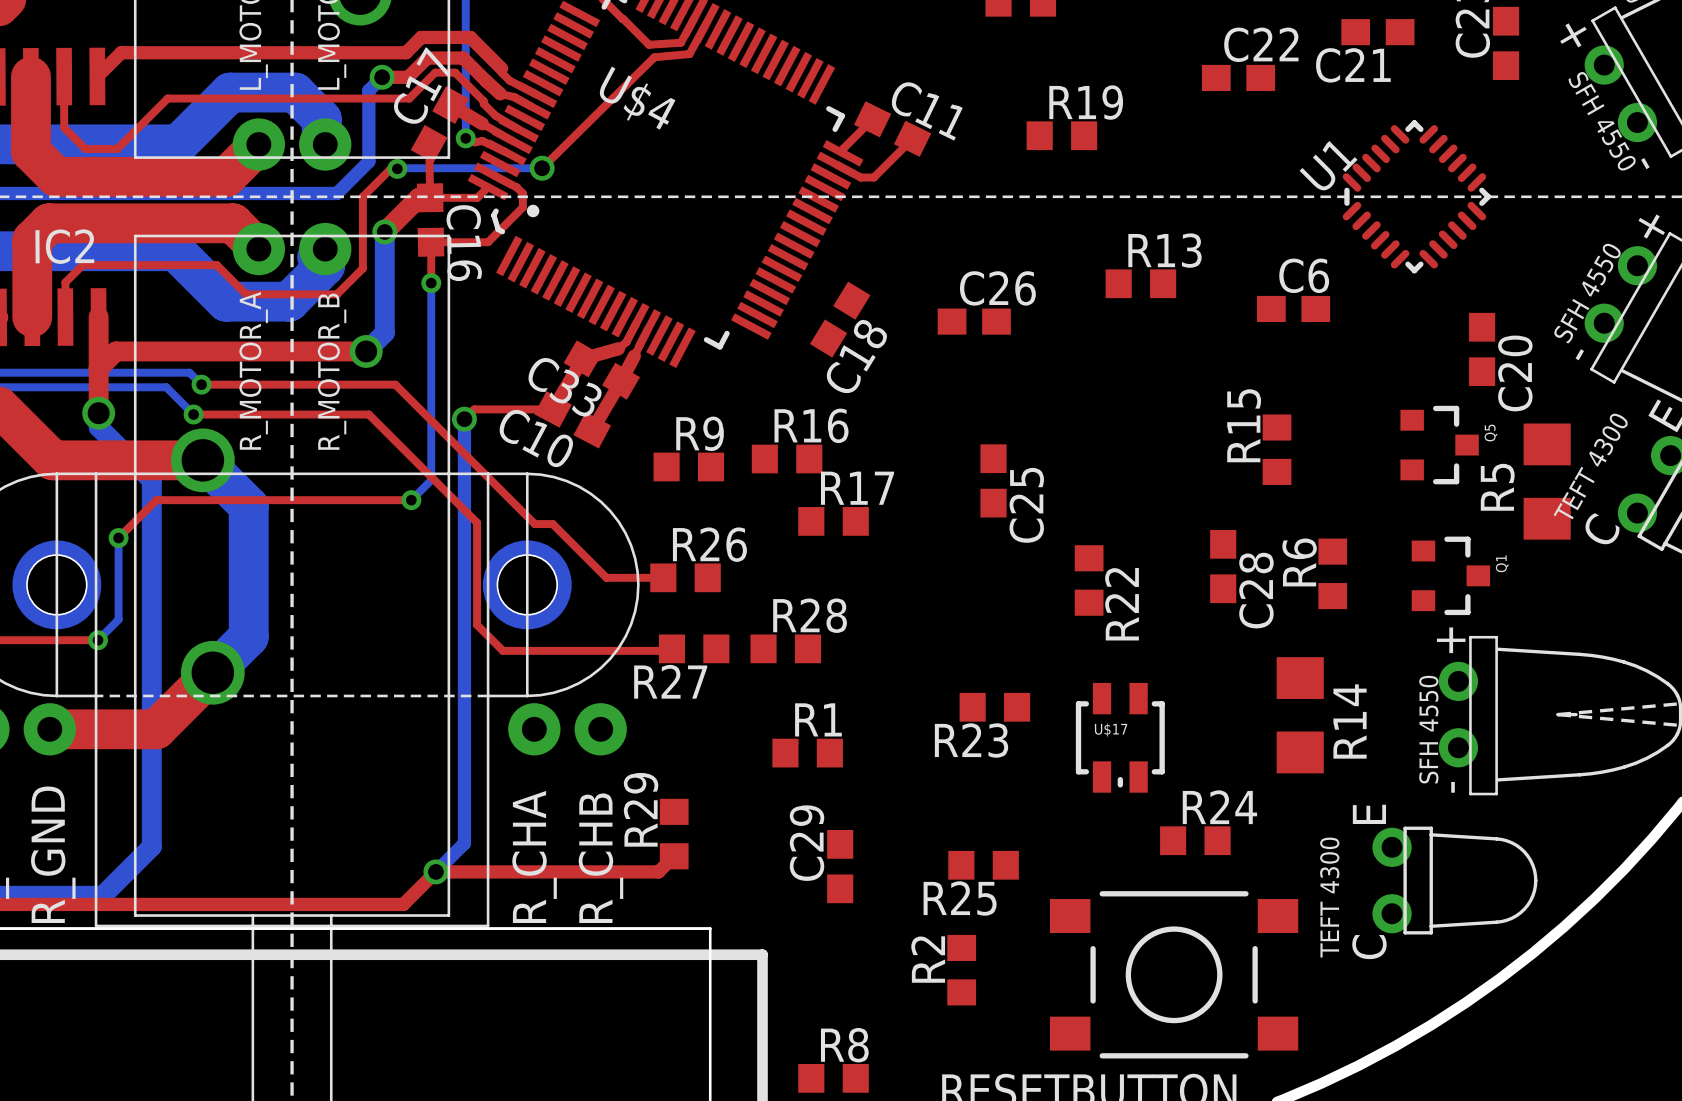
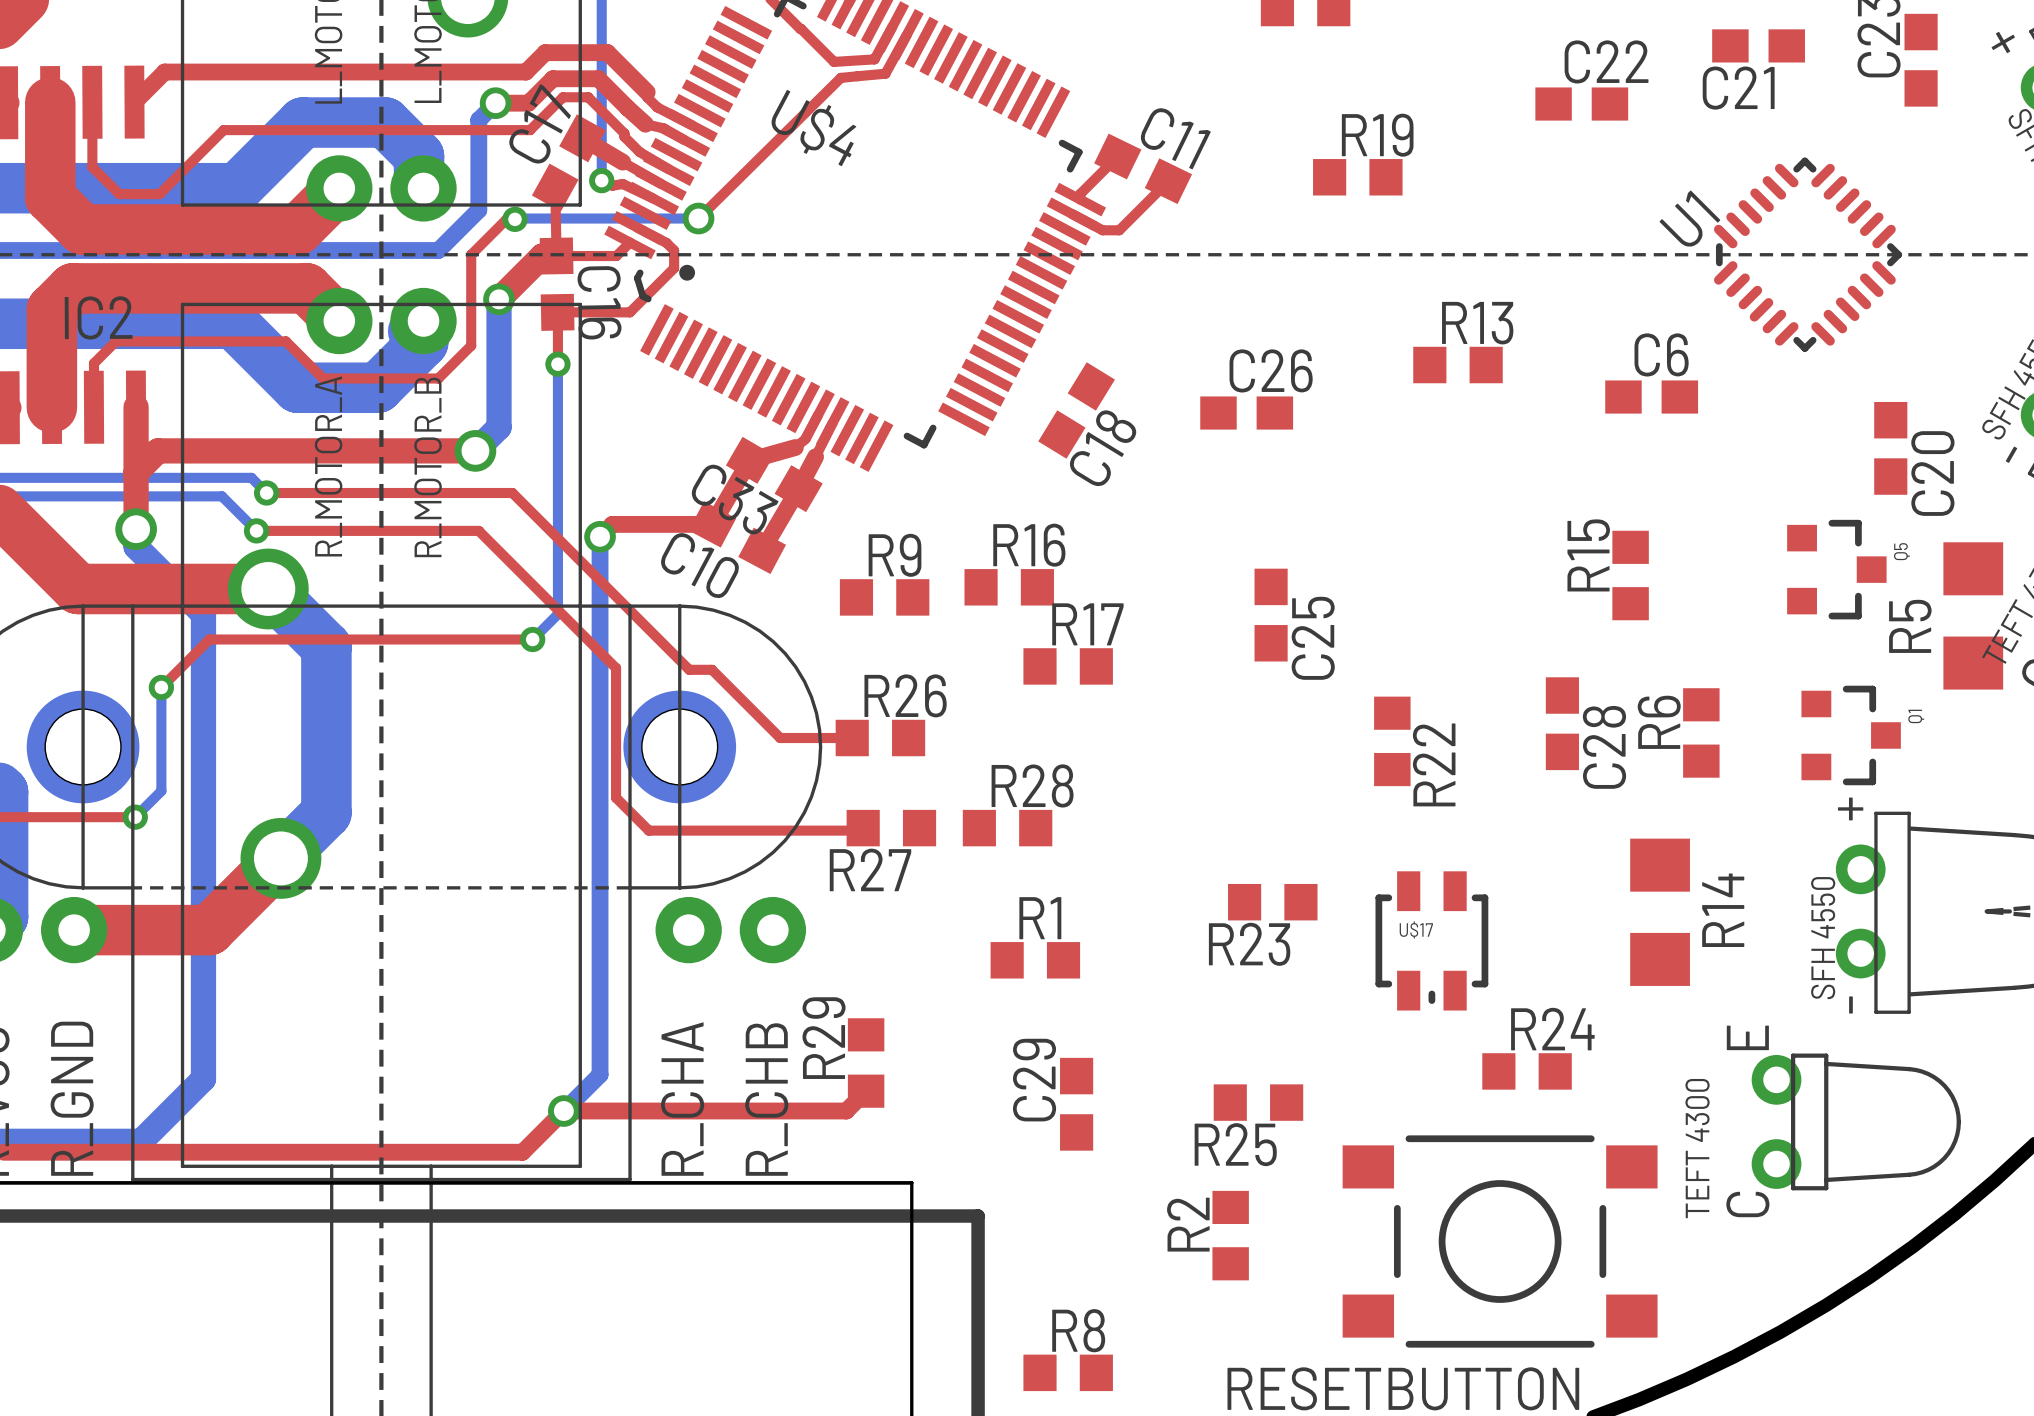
top track width: thin (553, 409) (474, 409) (464, 419) -> thick (712, 524) (612, 524) (600, 536)

